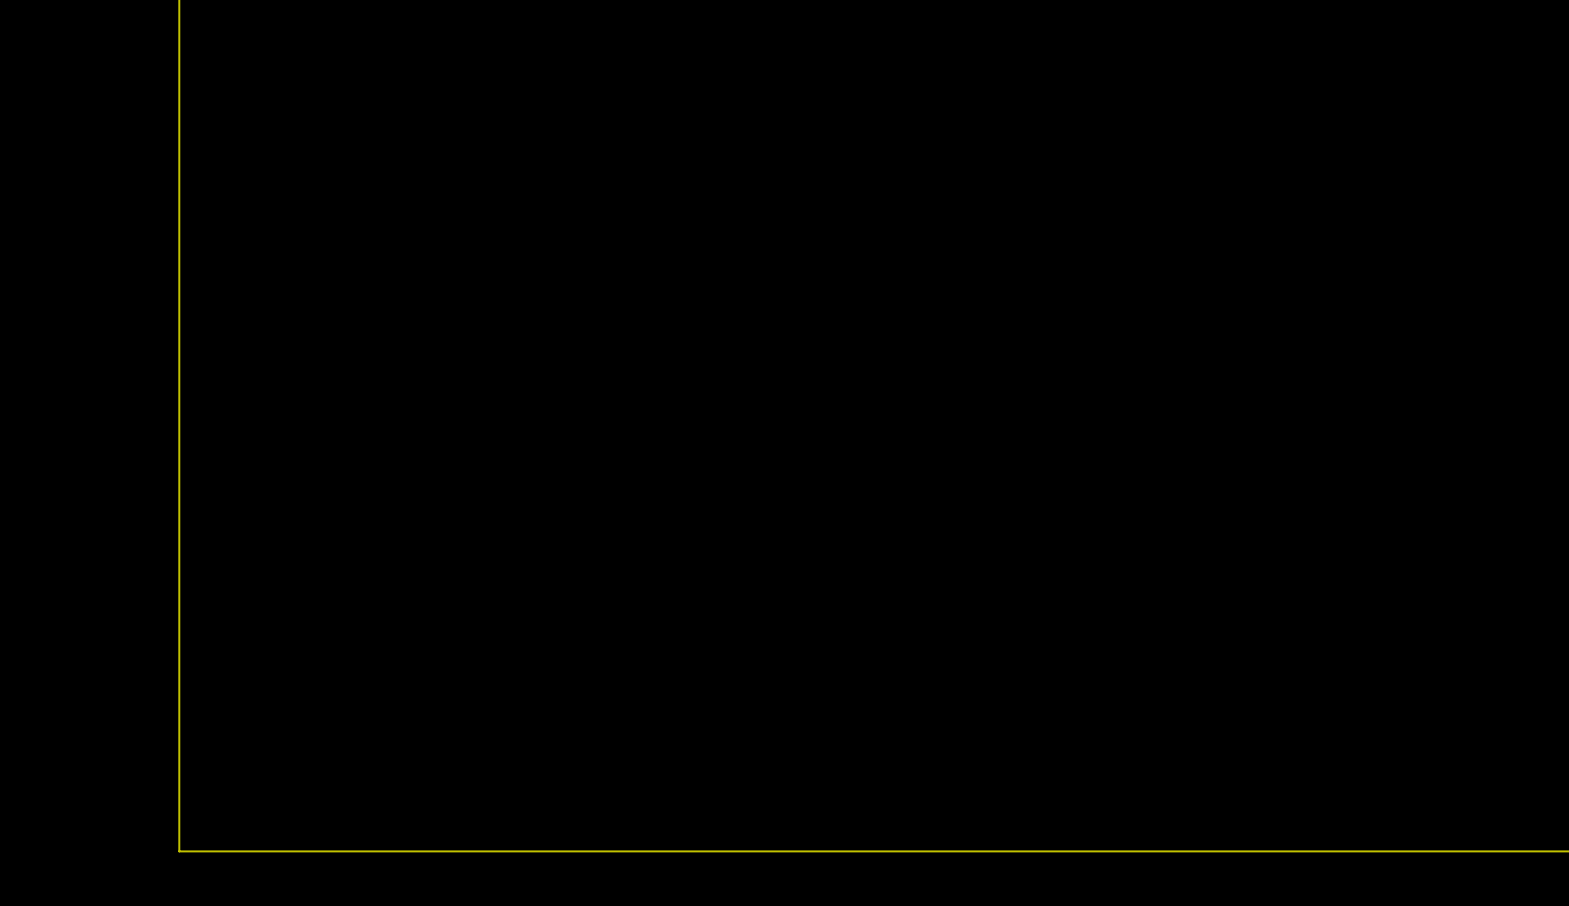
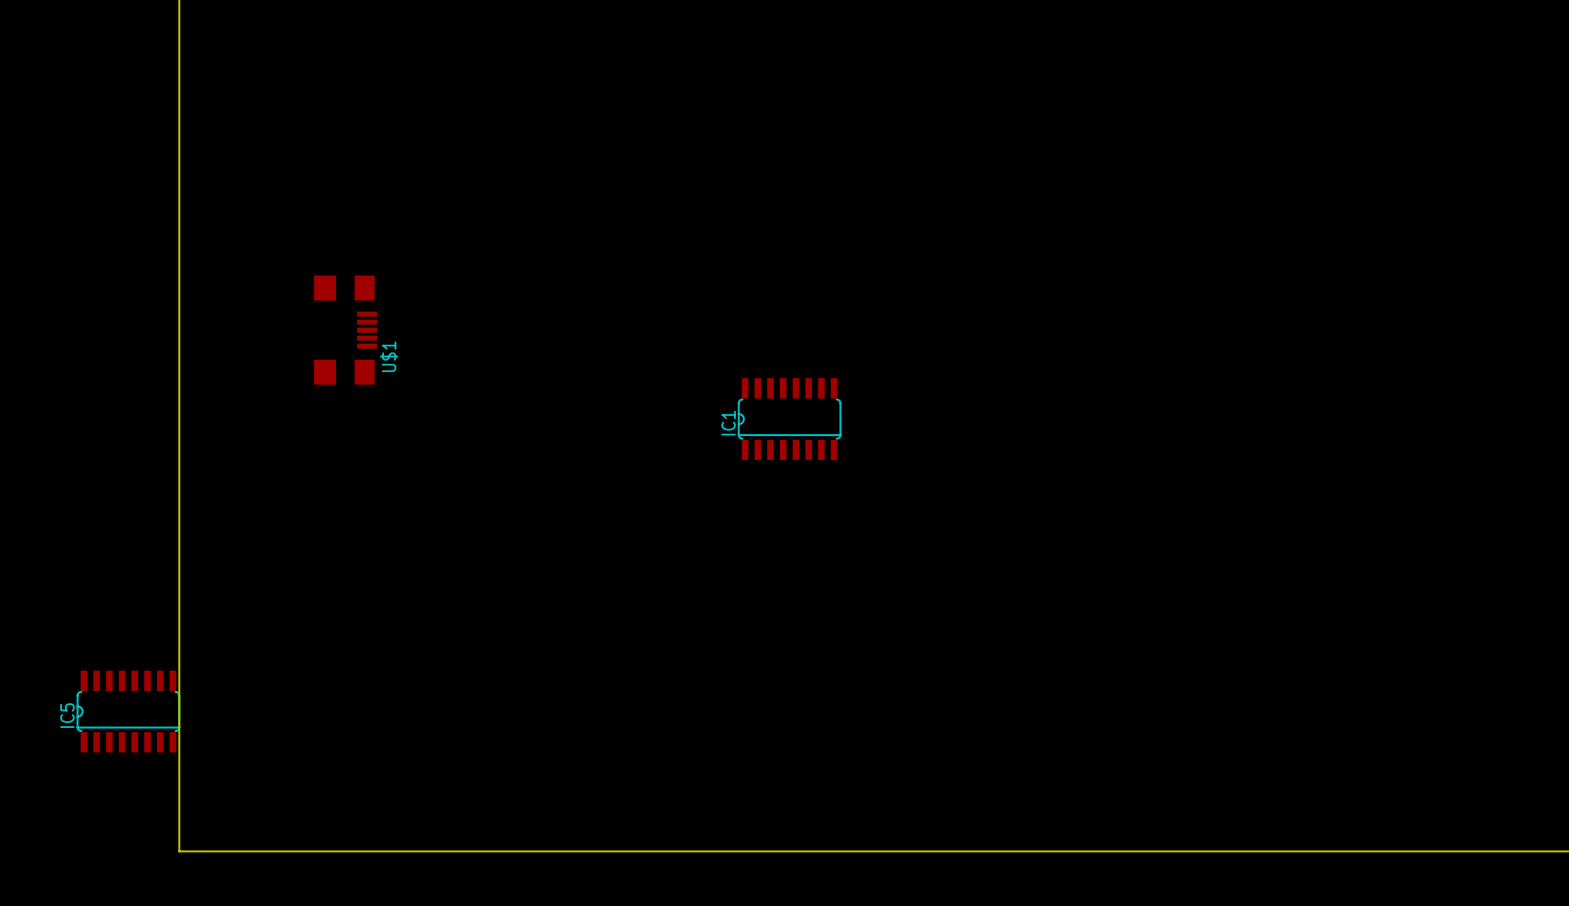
U$1: none -> (345, 330)
IC1: none -> (789, 419)
IC5: none -> (128, 711)

